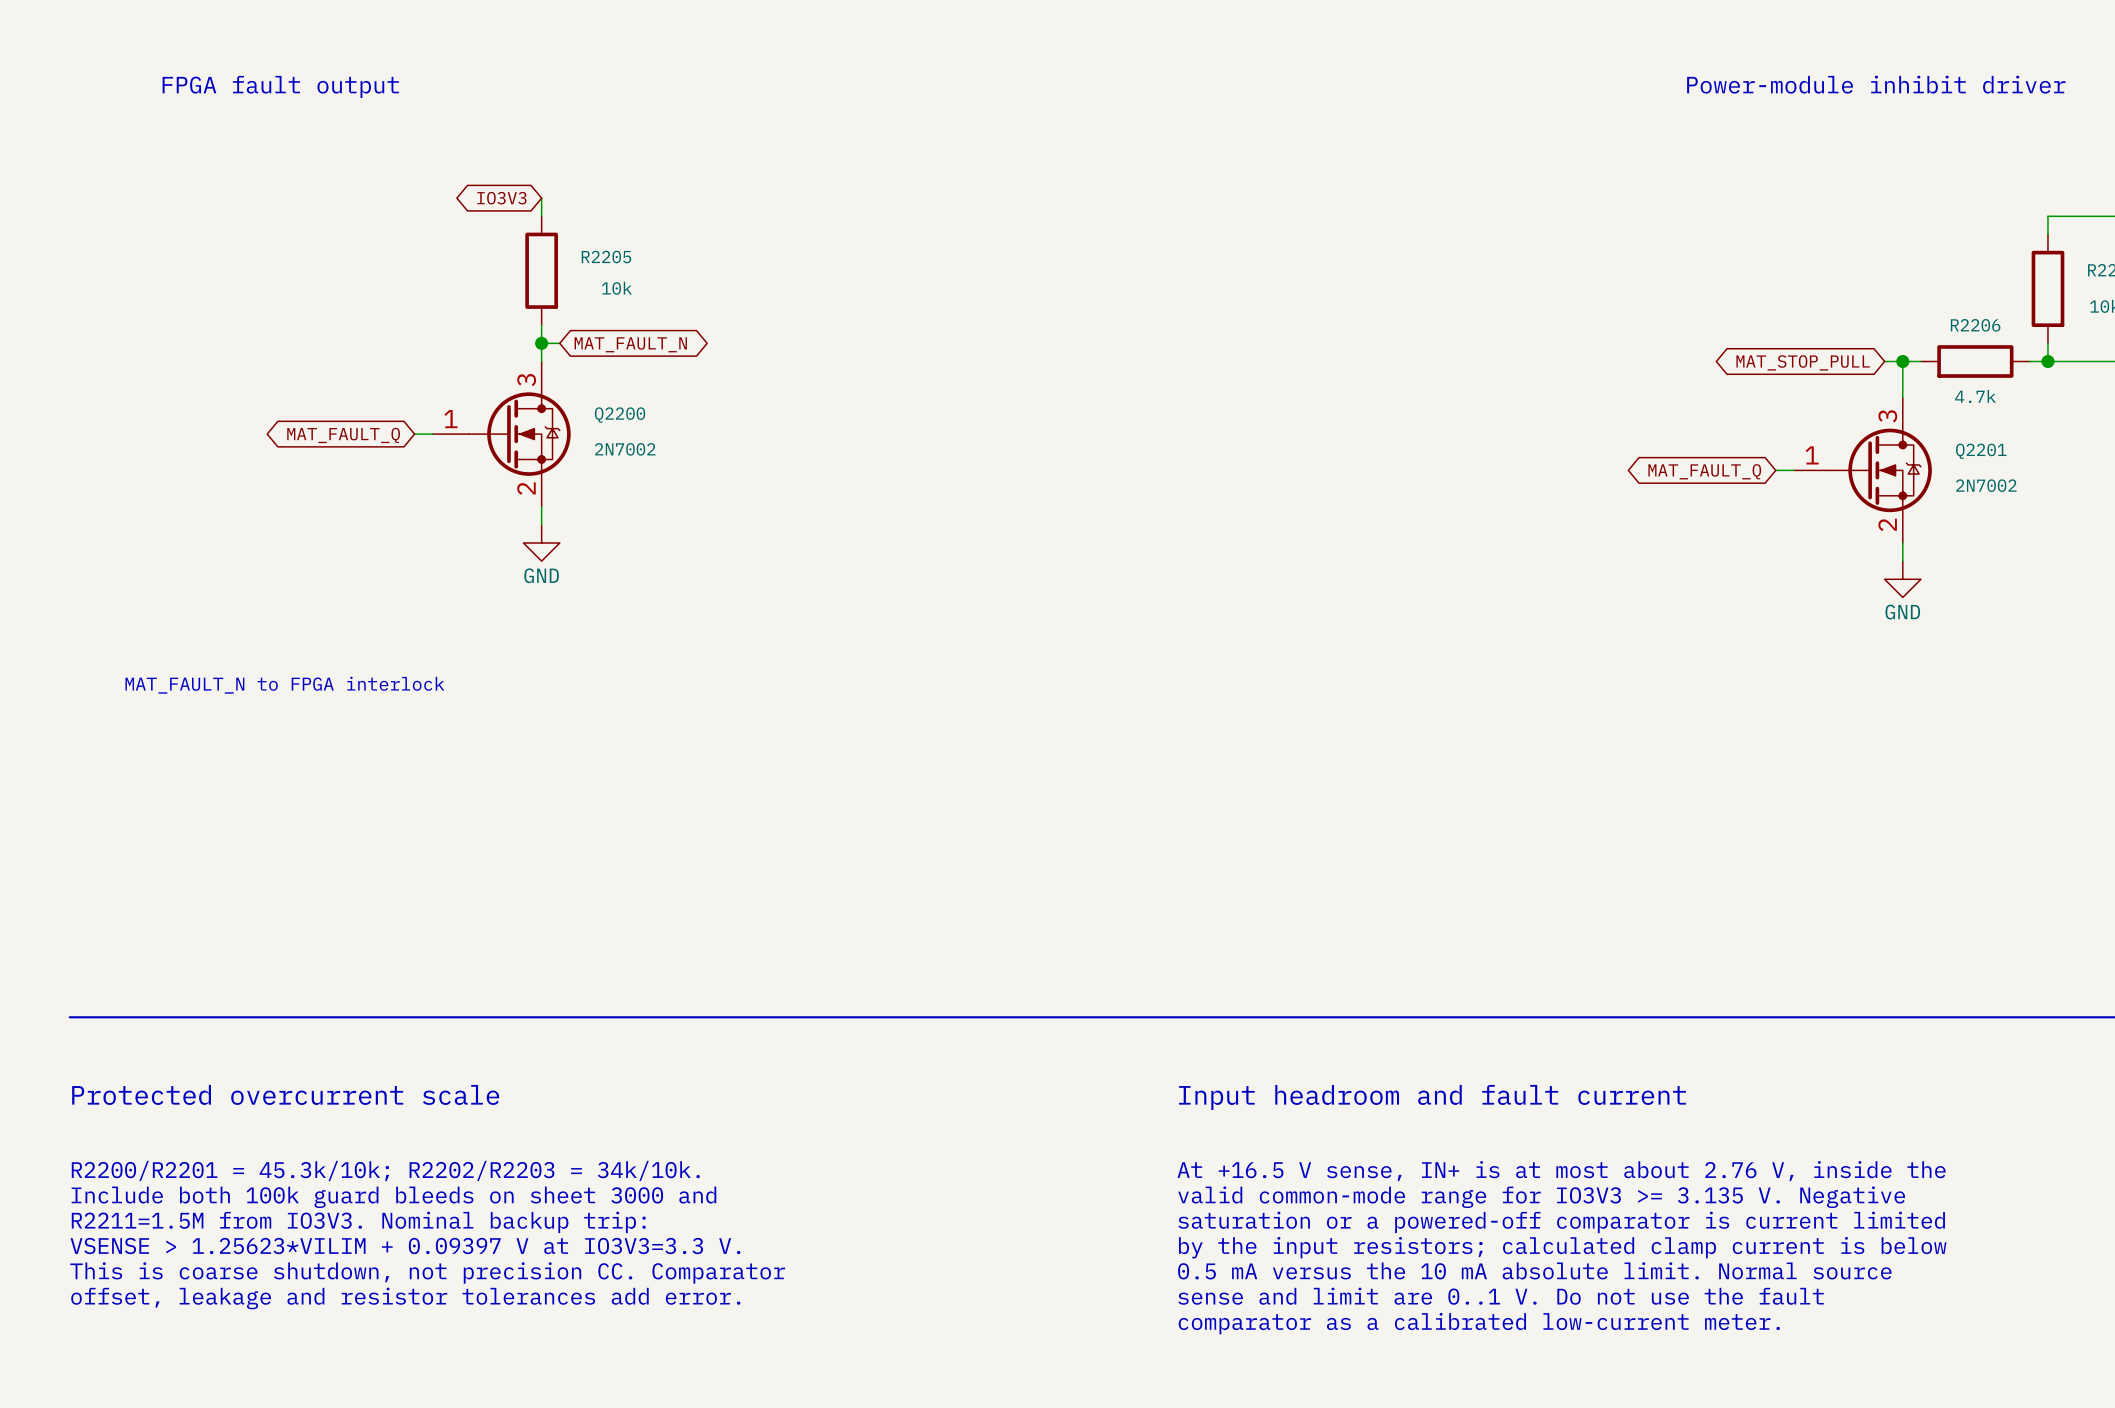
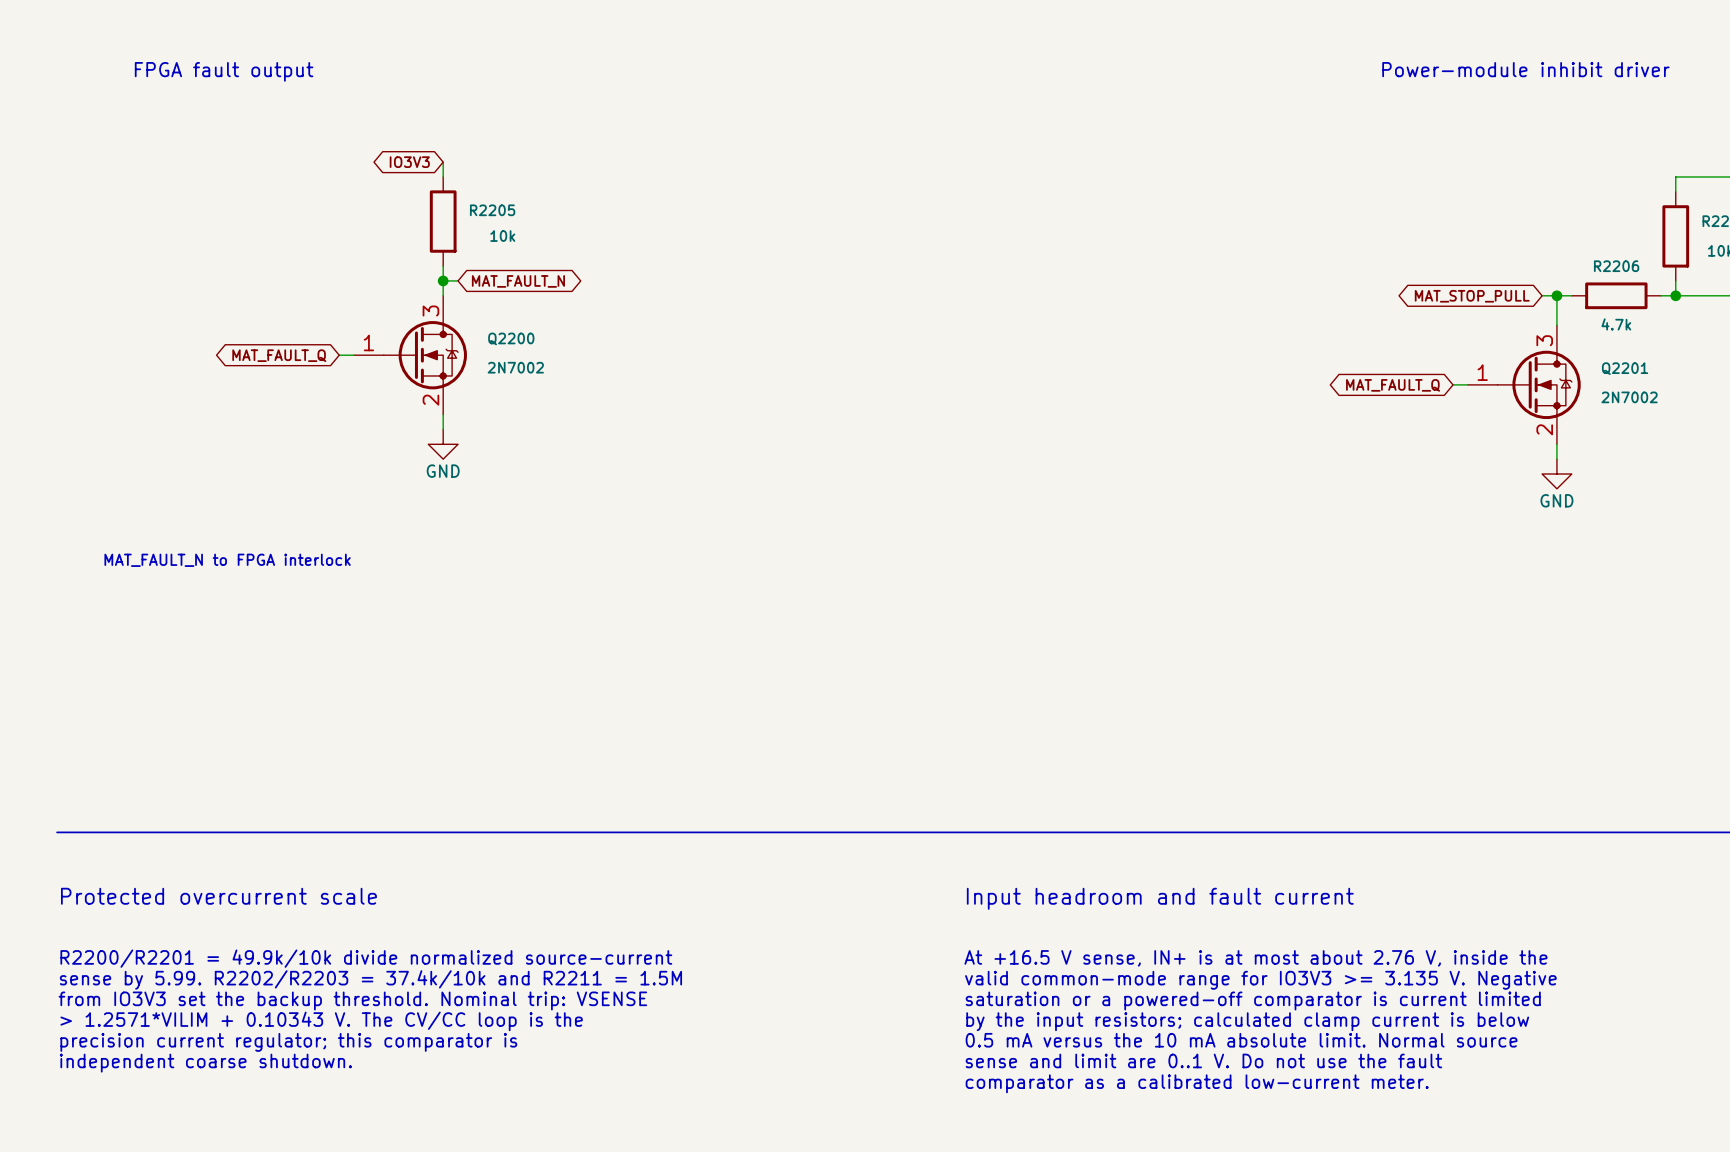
text: R2200/R2201 = 45.3k/10k; R2202/R2203 = 34k/10k. (385, 1170) -> R2200/R2201 = 49.9k/10k divide normalized source-current (366, 958)
text: Include both 100k guard bleeds on sheet 3000 and (393, 1197) -> sense by 5.99. R2202/R2203 = 37.4k/10k and R2211 = 1.5M (370, 979)
text: R2211=1.5M from IO3V3. Nominal backup trip: (358, 1222) -> from IO3V3 set the backup threshold. Nominal trip: VSENSE (352, 1000)
text: VSENSE > 1.25623*VILIM + 0.09397 V at IO3V3=3.3 V. (405, 1246) -> > 1.2571*VILIM + 0.10343 V. The CV/CC loop is the (321, 1021)
text: This is coarse shutdown, not precision CC. Comparator (427, 1273) -> precision current regulator; this comparator is (288, 1042)
text: offset, leakage and resistor tolerances add error. (405, 1298) -> independent coarse shutdown. (205, 1063)

